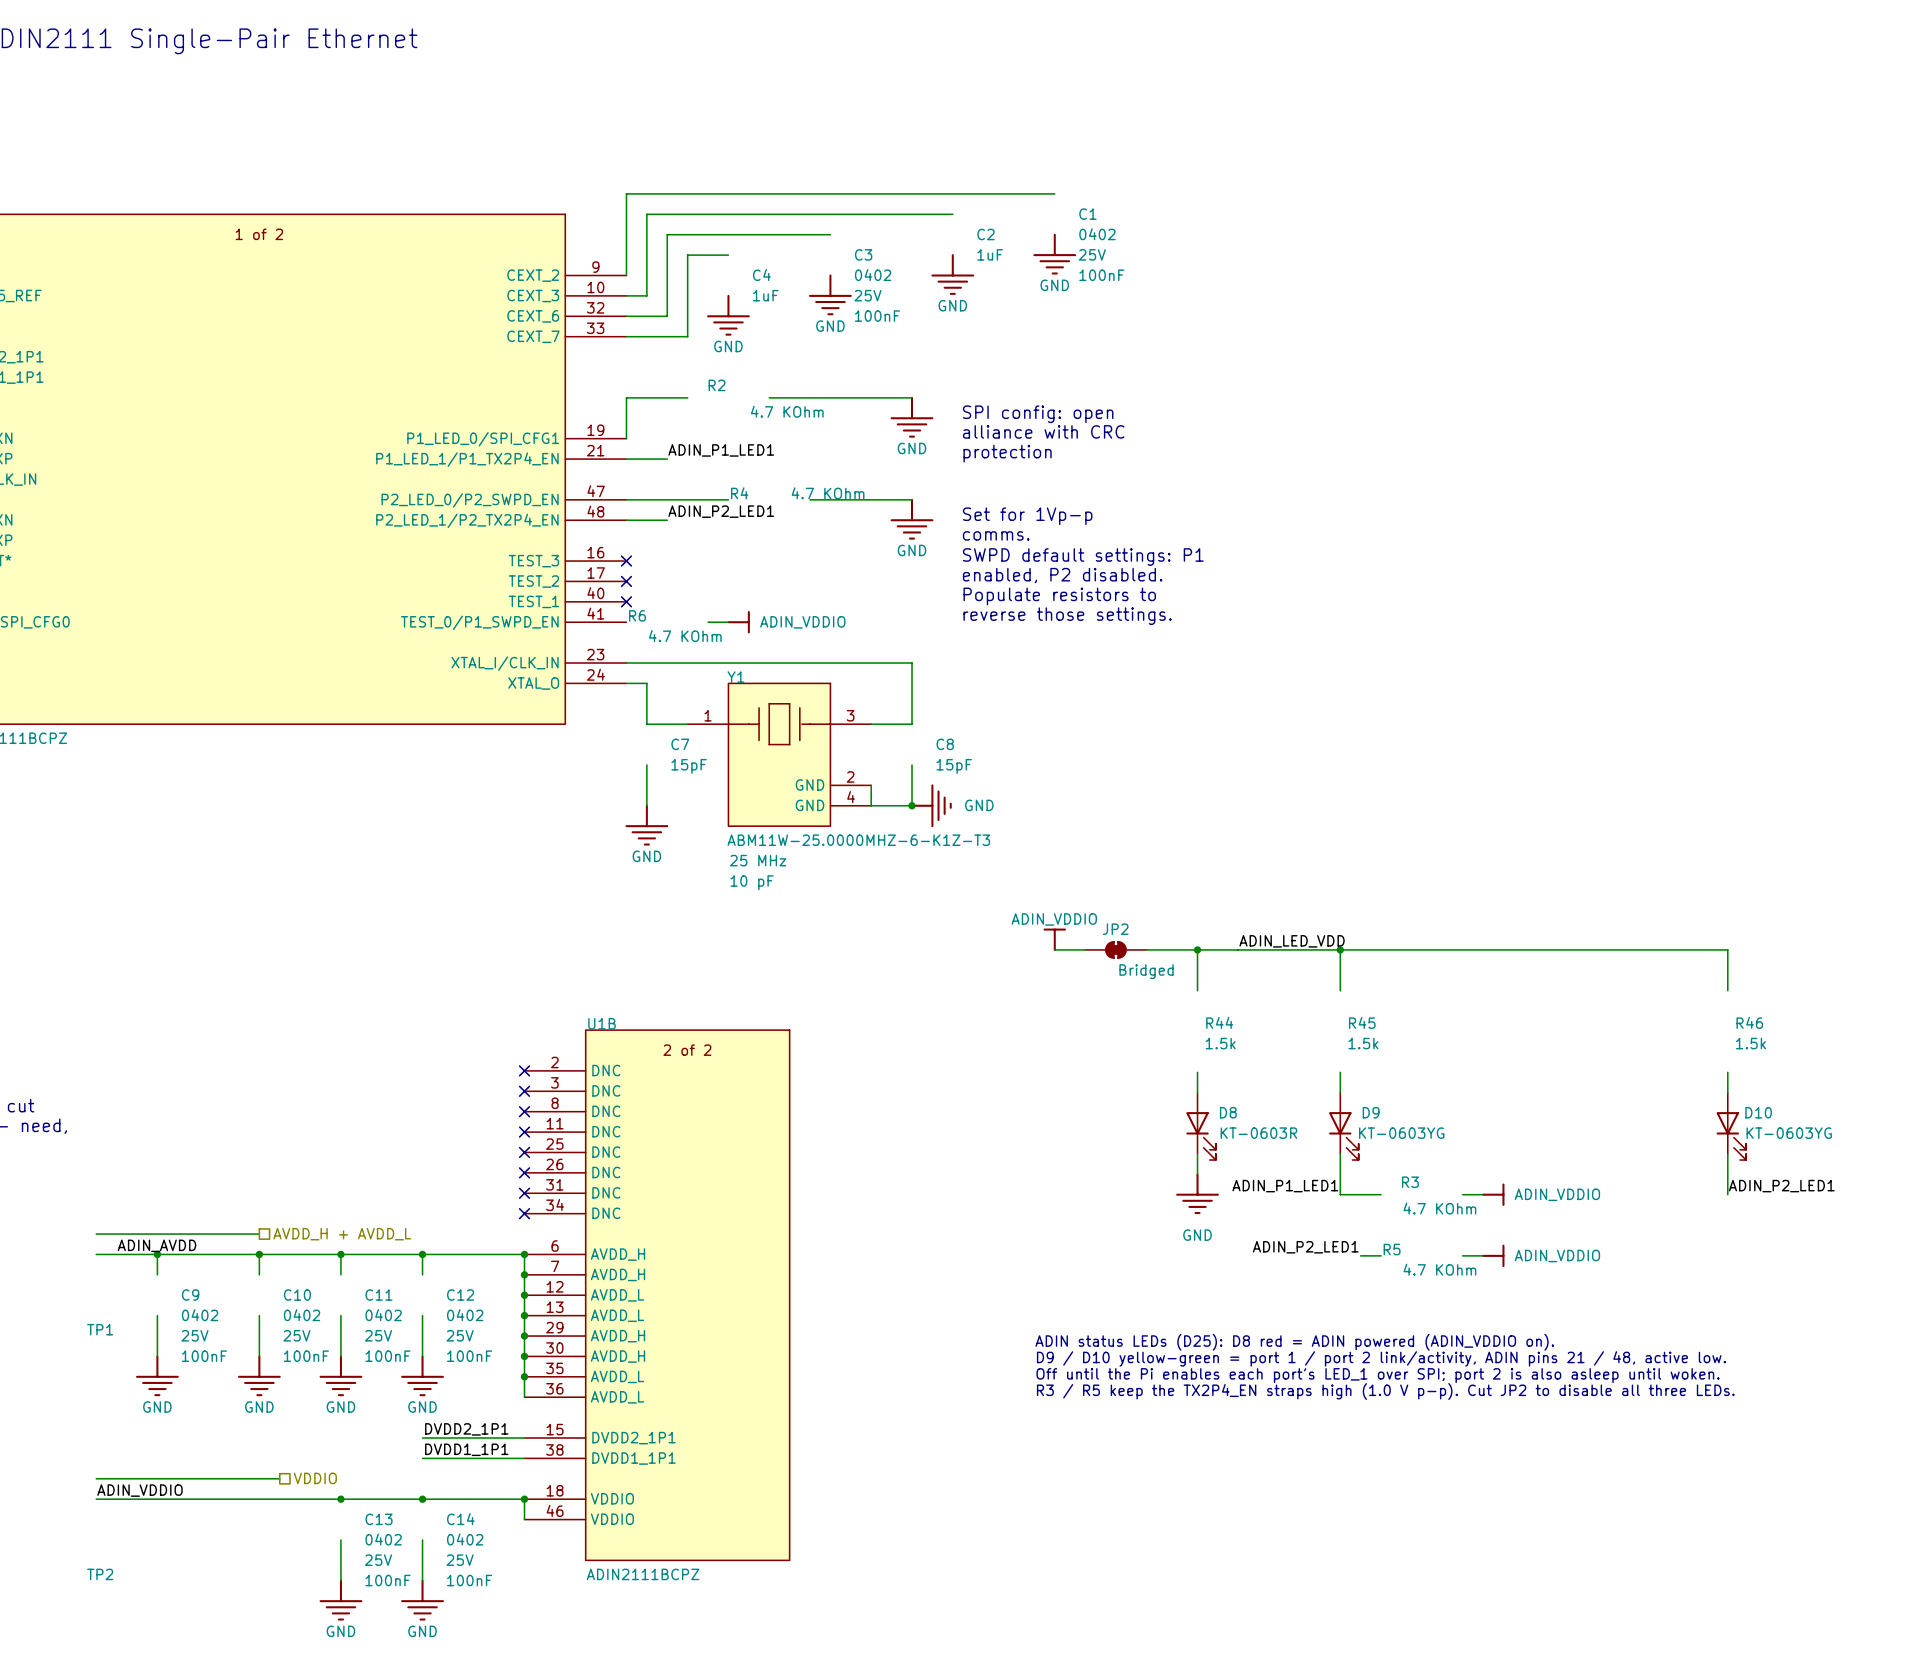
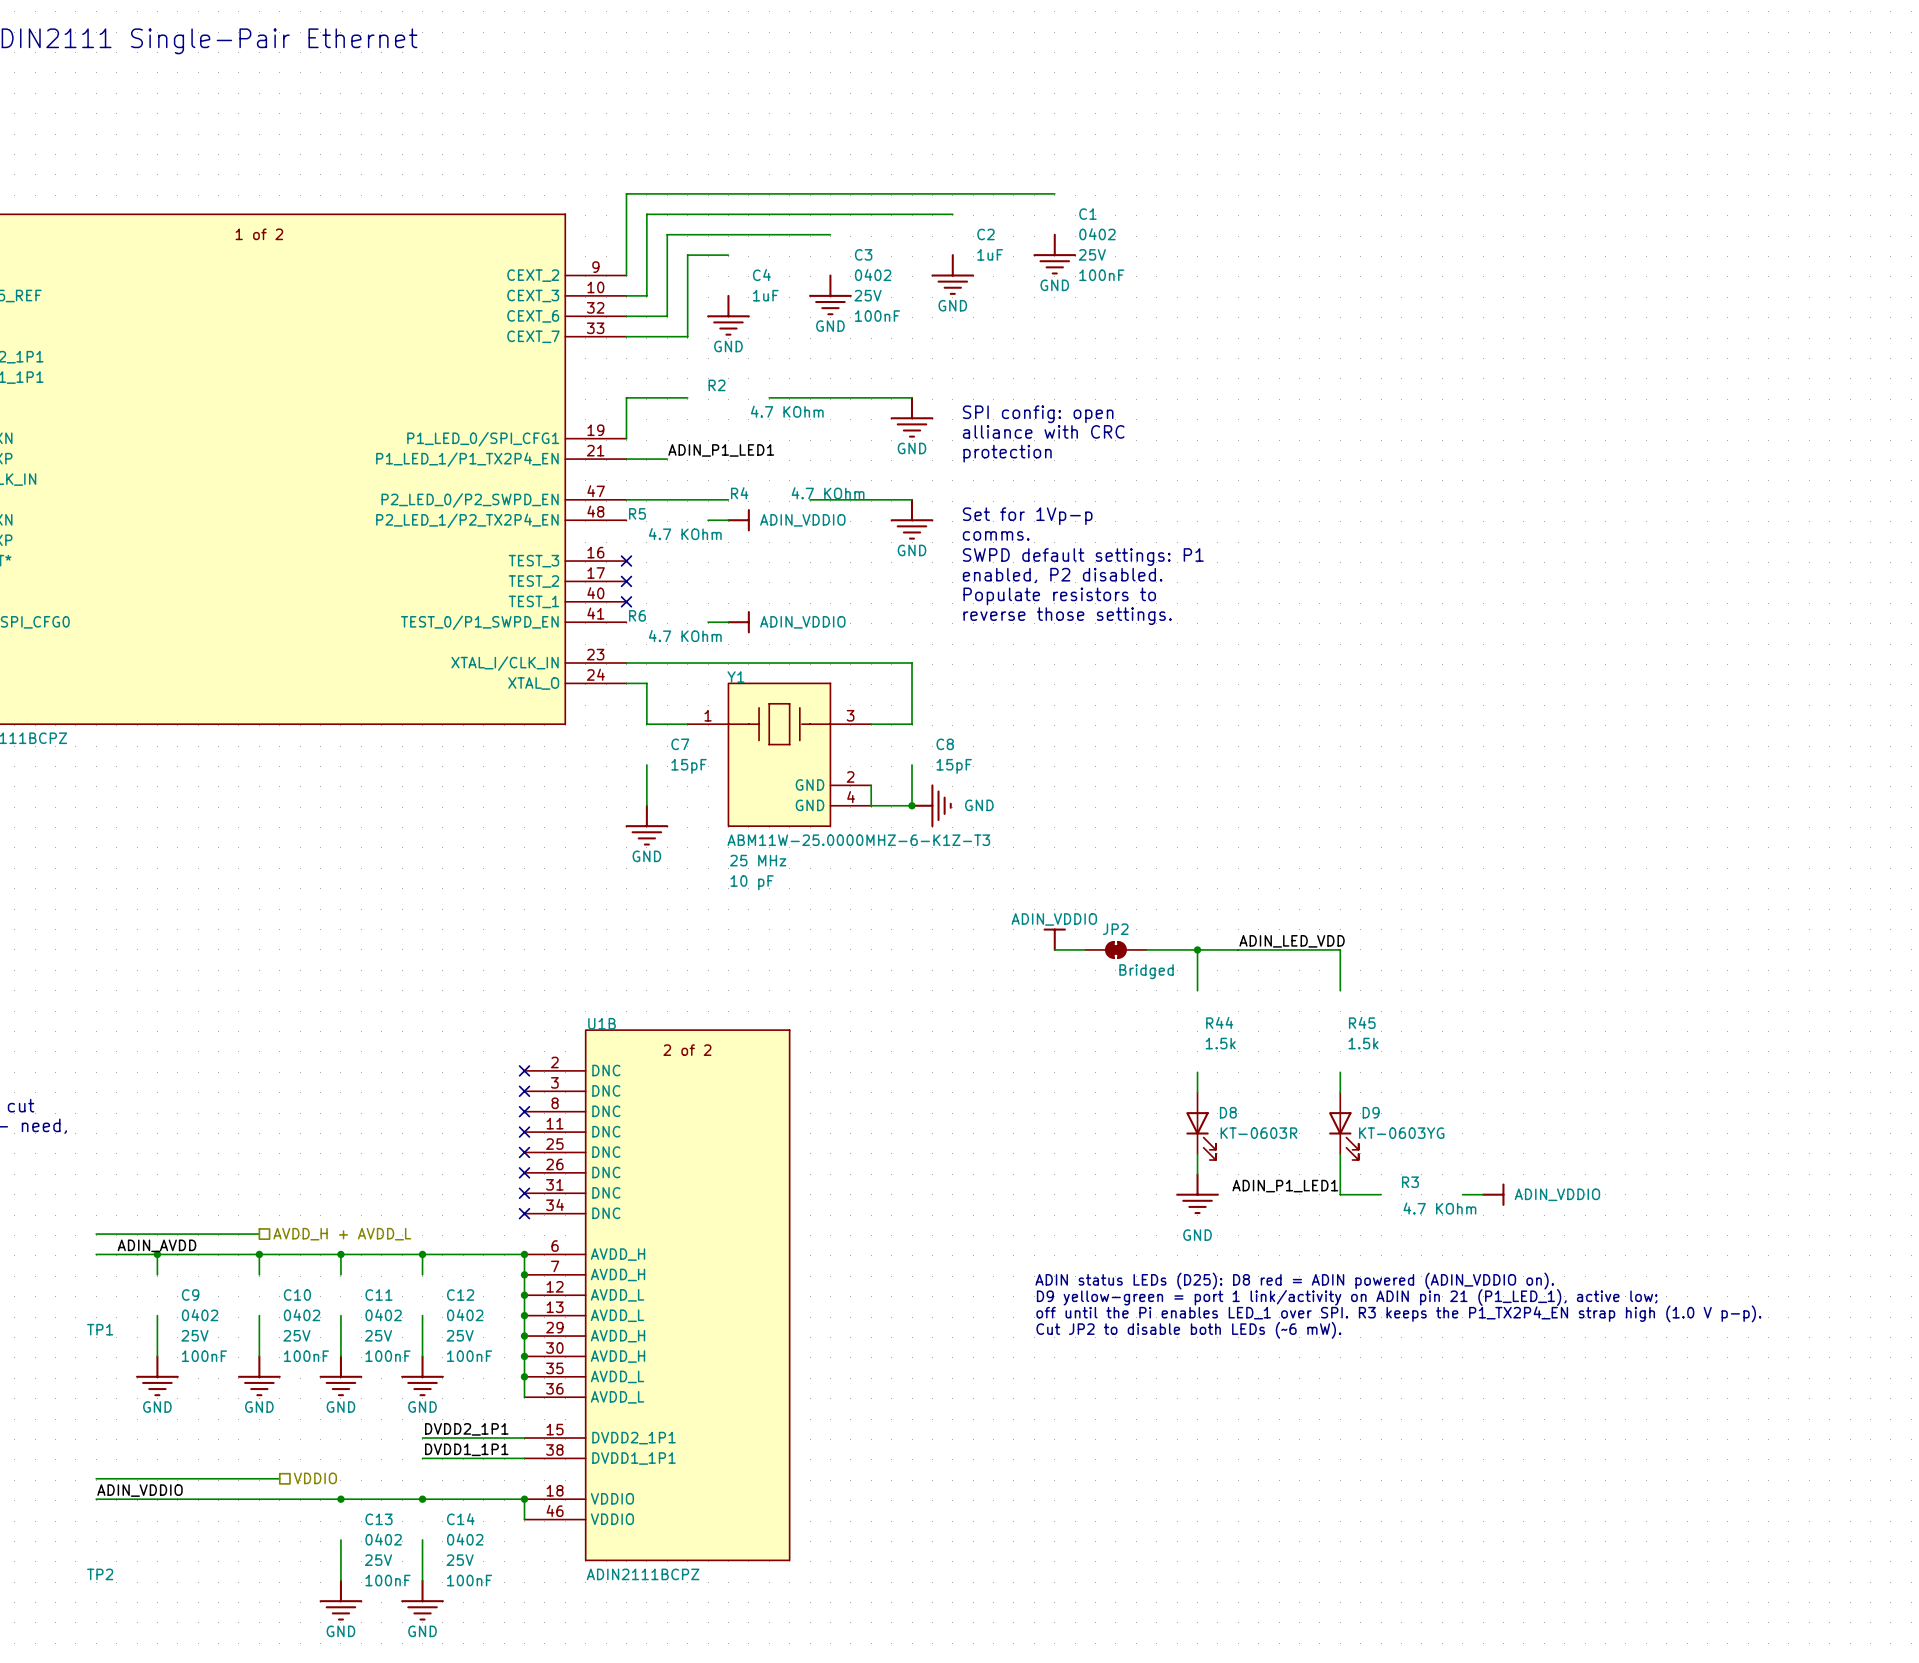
label: ADIN_P2_LED1 (721, 511) -> none
wire: (626, 520) (667, 520) -> none
wire: none -> (708, 520) (728, 520)
power symbol: none -> ADIN_VDDIO (738, 520)
wire: (1340, 949) (1727, 949) (1727, 990) -> none
junction: (1340, 949) -> none
R46: (1750, 1033) -> none
wire: (1727, 1072) (1727, 1092) -> none
D10: KT-0603YG (1731, 1126) -> none
wire: (1727, 1153) (1727, 1194) -> none
label: ADIN_P2_LED1 (1781, 1186) -> none
label: ADIN_P2_LED1 (1305, 1247) -> none
wire: (1360, 1255) (1381, 1255) -> none
wire: (1462, 1255) (1483, 1255) -> none
power symbol: ADIN_VDDIO (1493, 1255) -> none
R5 position: (1429, 1259) -> (675, 524)
text: none -> D9 yellow-green = port 1 link/activity on ADIN pin 21 (P1_LED_1), active low; (1347, 1297)
text: none -> off until the Pi enables LED_1 over SPI. R3 keeps the P1_TX2P4_EN strap high (1.0 V p-p). (1398, 1313)
text: none -> Cut JP2 to disable both LEDs (~6 mW). (1188, 1330)
text position: ADIN status LEDs (D25): D8 red = ADIN powered (ADIN_VDDIO on). (1294, 1342) -> ADIN status LEDs (D25): D8 red = ADIN powered (ADIN_VDDIO on). (1294, 1281)
text: D9 / D10 yellow-green = port 1 / port 2 link/activity, ADIN pins 21 / 48, active low. (1381, 1358) -> none
text: Off until the Pi enables each port's LED_1 over SPI; port 2 is also asleep until woken. (1378, 1375) -> none
text: R3 / R5 keep the TX2P4_EN straps high (1.0 V p-p). Cut JP2 to disable all three LEDs. (1385, 1391) -> none

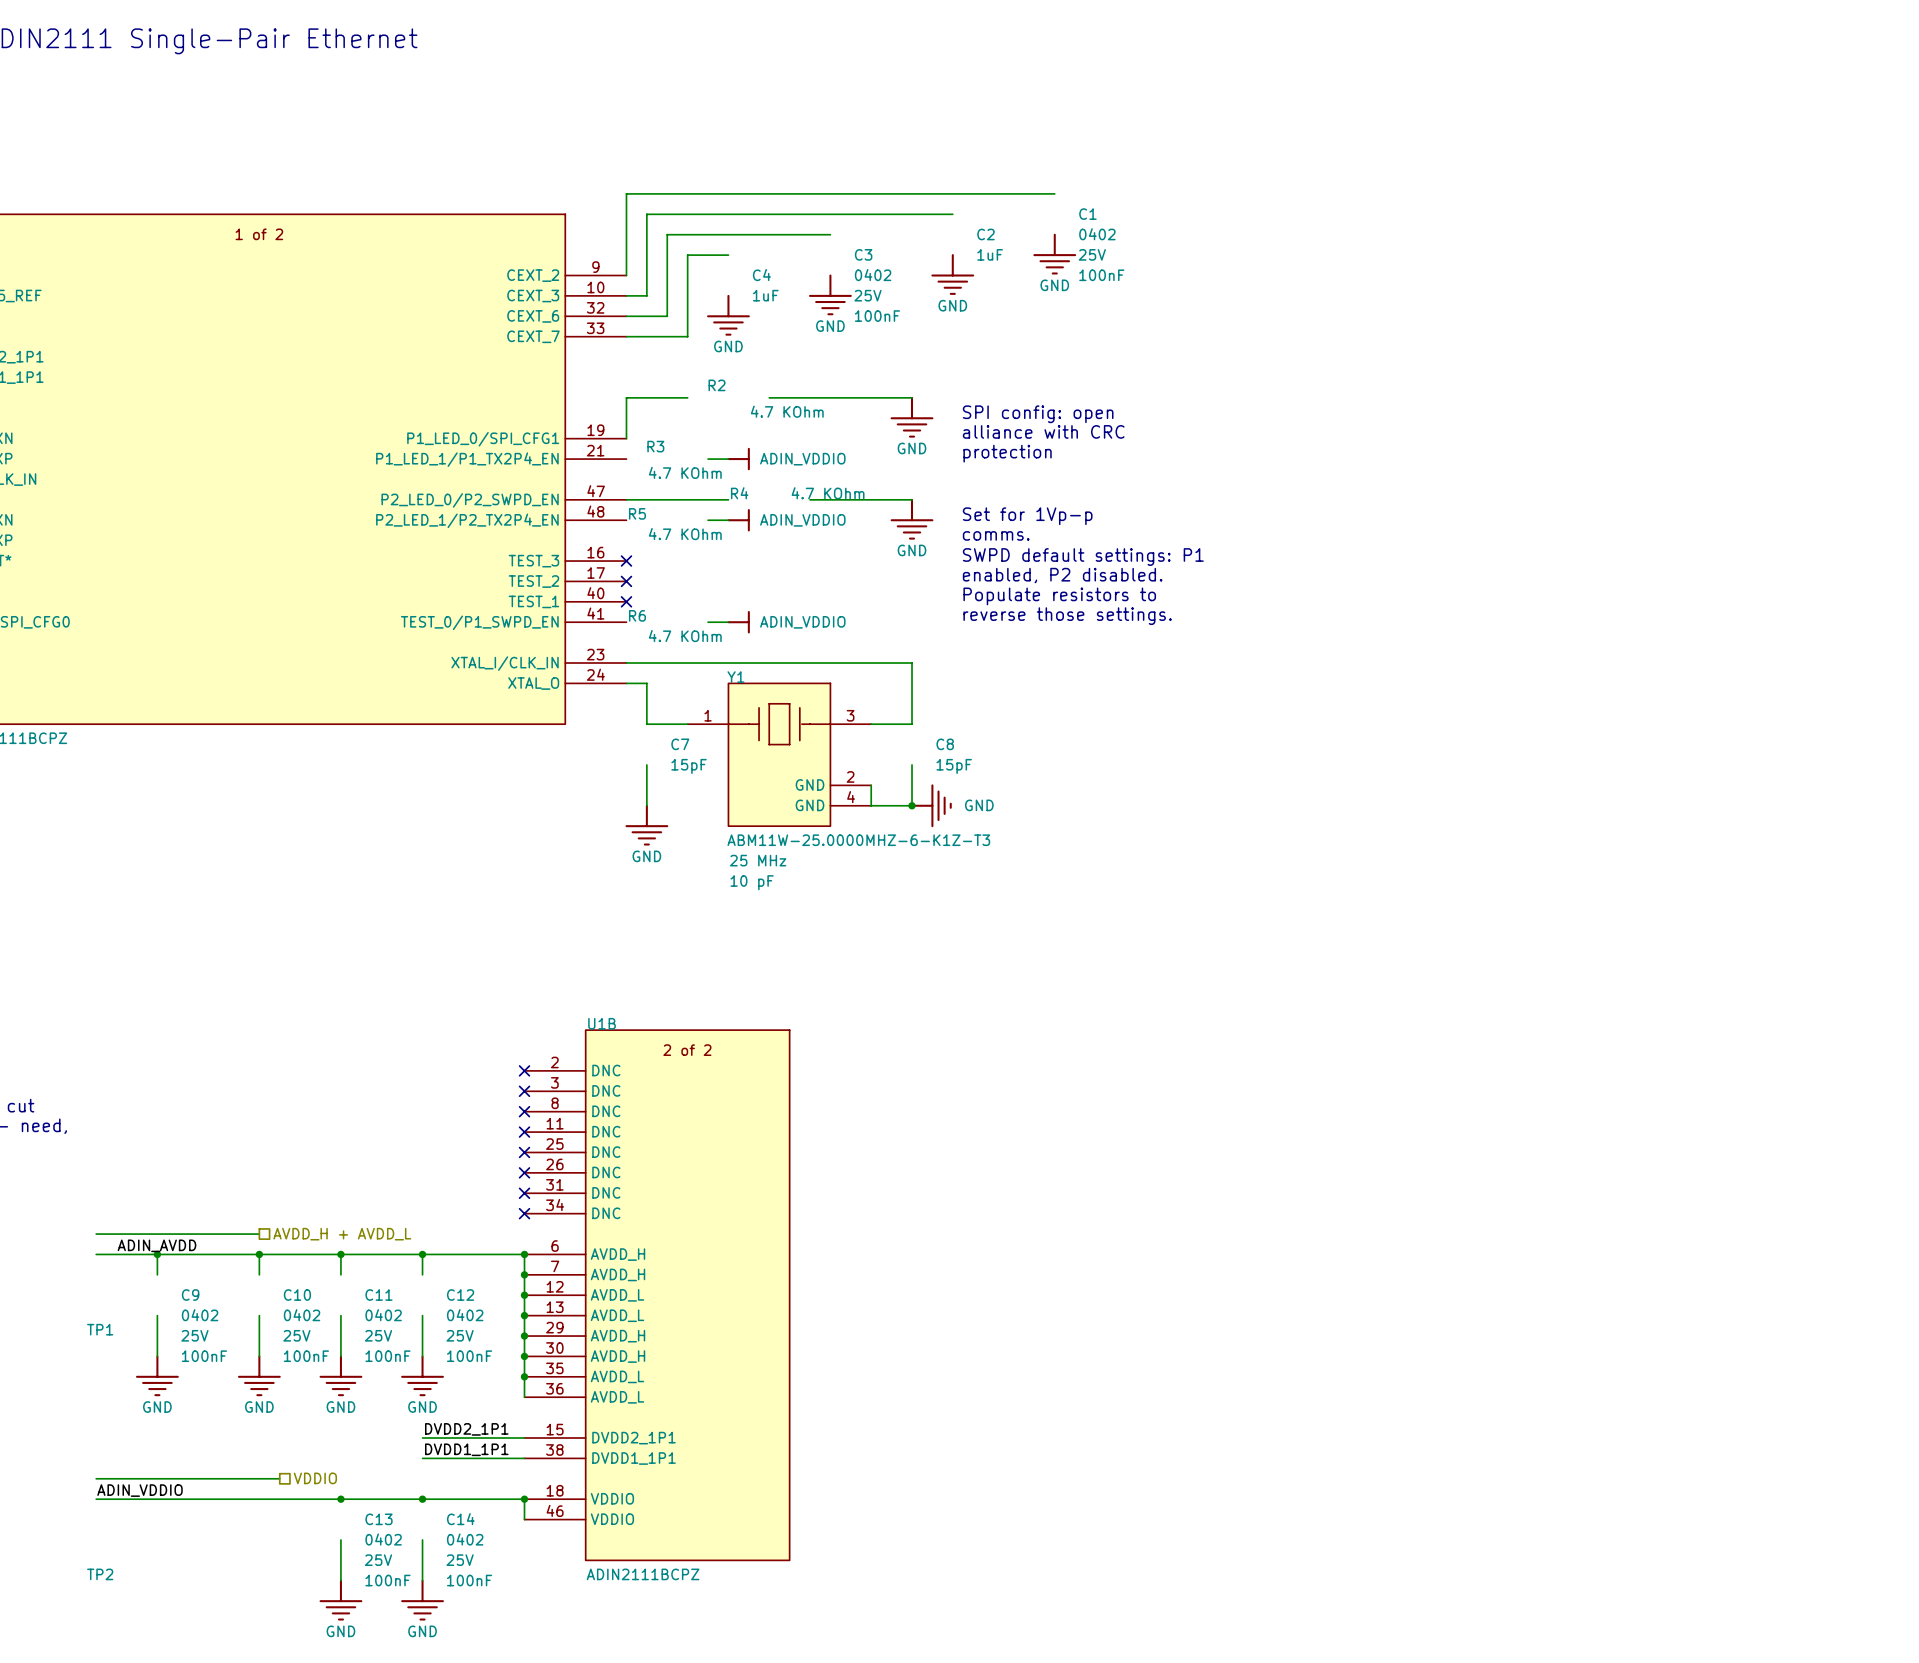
label: ADIN_P1_LED1 (721, 450) -> none
wire: (626, 459) (667, 459) -> none
wire: none -> (708, 459) (728, 459)
power symbol: none -> ADIN_VDDIO (738, 459)
power symbol: ADIN_VDDIO (1054, 939) -> none
label: ADIN_LED_VDD (1292, 941) -> none
wire: (1054, 949) (1085, 949) -> none
JP2: Bridged (1115, 949) -> none
wire: (1146, 949) (1340, 949) (1340, 990) -> none
wire: (1197, 949) (1197, 990) -> none
junction: (1197, 949) -> none
R44: (1220, 1033) -> none
R45: (1363, 1033) -> none
wire: (1197, 1072) (1197, 1092) -> none
wire: (1340, 1072) (1340, 1092) -> none
D8: KT-0603R (1201, 1126) -> none
D9: KT-0603YG (1343, 1126) -> none
wire: (1197, 1153) (1197, 1174) -> none
wire: (1340, 1153) (1340, 1194) (1381, 1194) -> none
label: ADIN_P1_LED1 (1285, 1186) -> none
power symbol: GND (1197, 1193) -> none
wire: (1462, 1194) (1483, 1194) -> none
power symbol: ADIN_VDDIO (1493, 1194) -> none
R3 position: (1439, 1195) -> (684, 459)
text: ADIN status LEDs (D25): D8 red = ADIN powered (ADIN_VDDIO on). (1294, 1281) -> none
text: D9 yellow-green = port 1 link/activity on ADIN pin 21 (P1_LED_1), active low; (1347, 1297) -> none
text: off until the Pi enables LED_1 over SPI. R3 keeps the P1_TX2P4_EN strap high (1.0 V p-p). (1398, 1313) -> none
text: Cut JP2 to disable both LEDs (~6 mW). (1188, 1330) -> none

